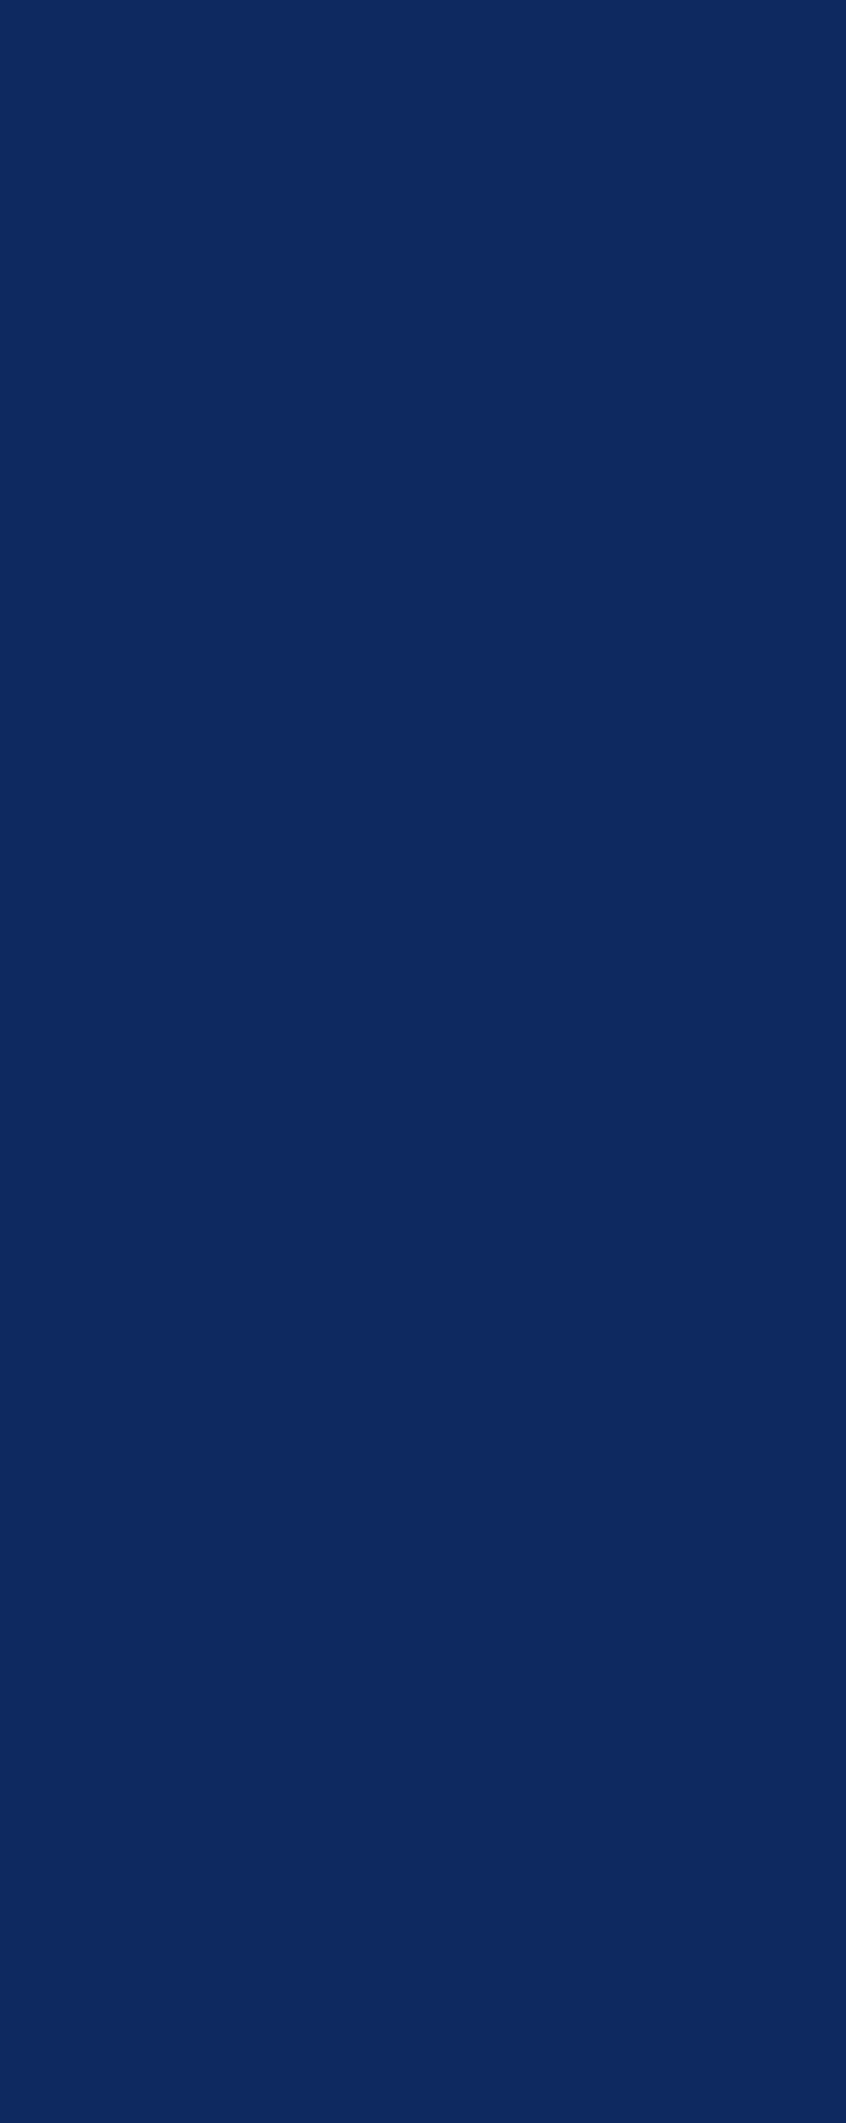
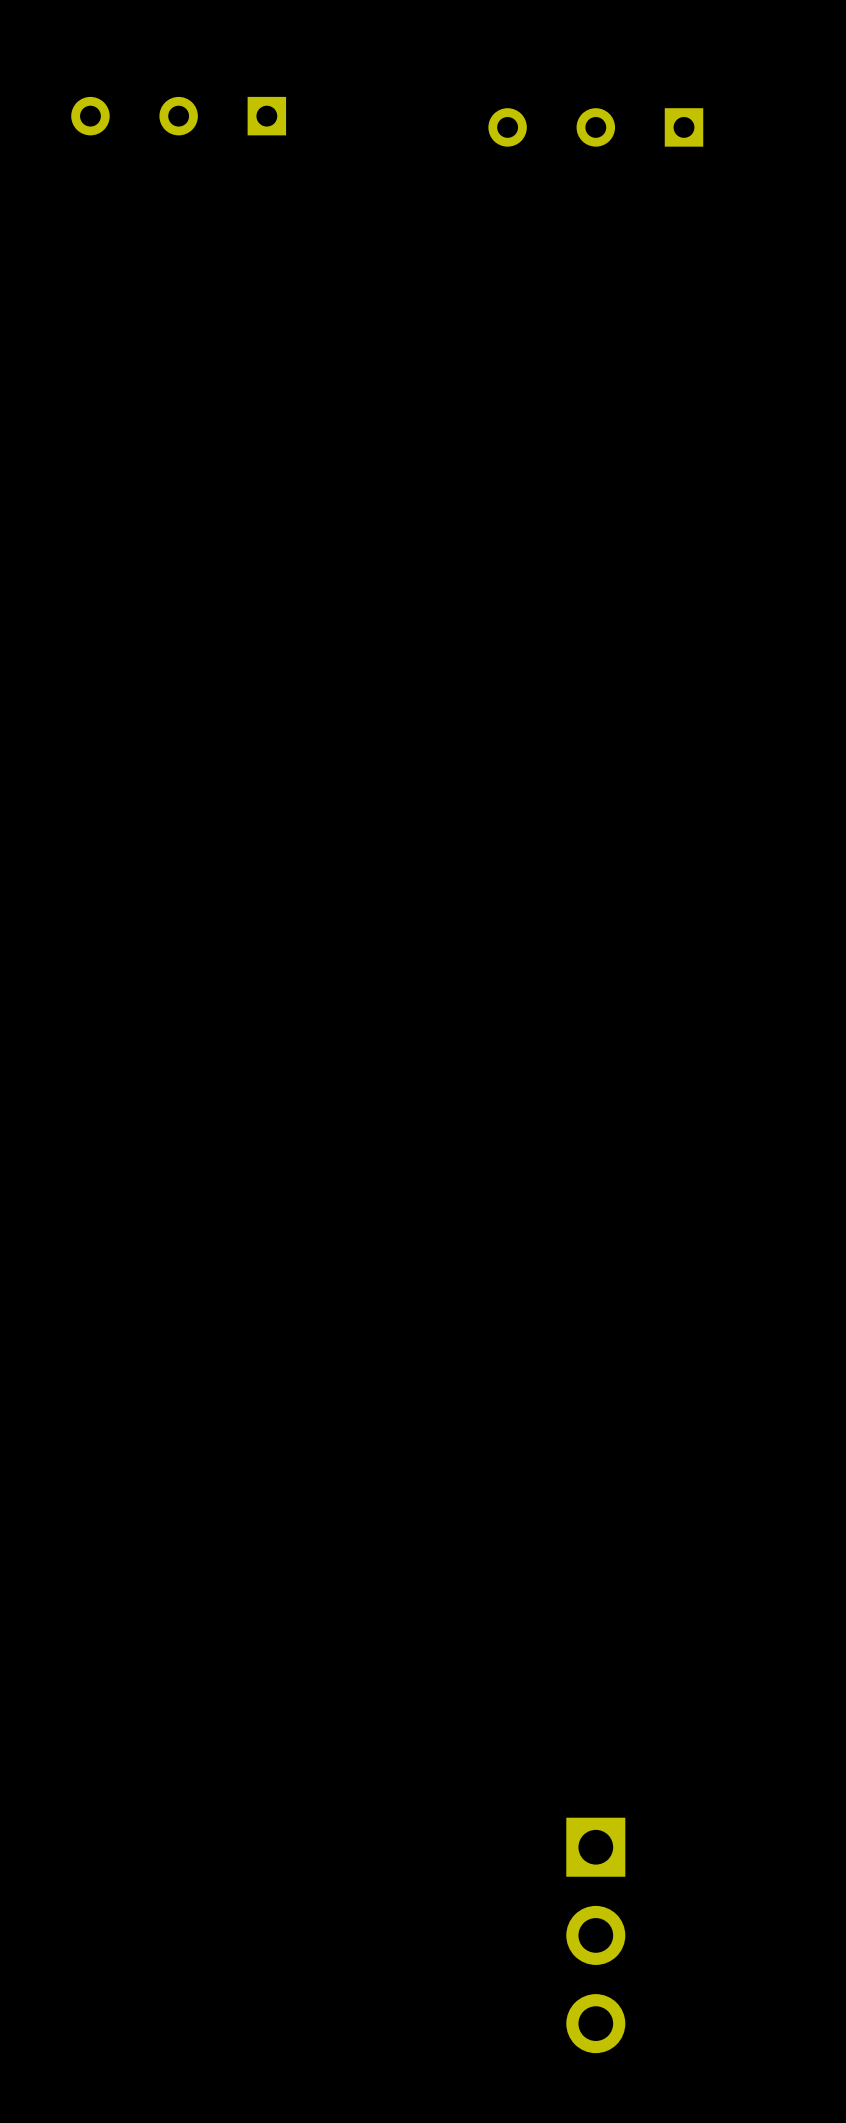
part: none -> (178, 116)
part: none -> (595, 127)
part: none -> (595, 1935)

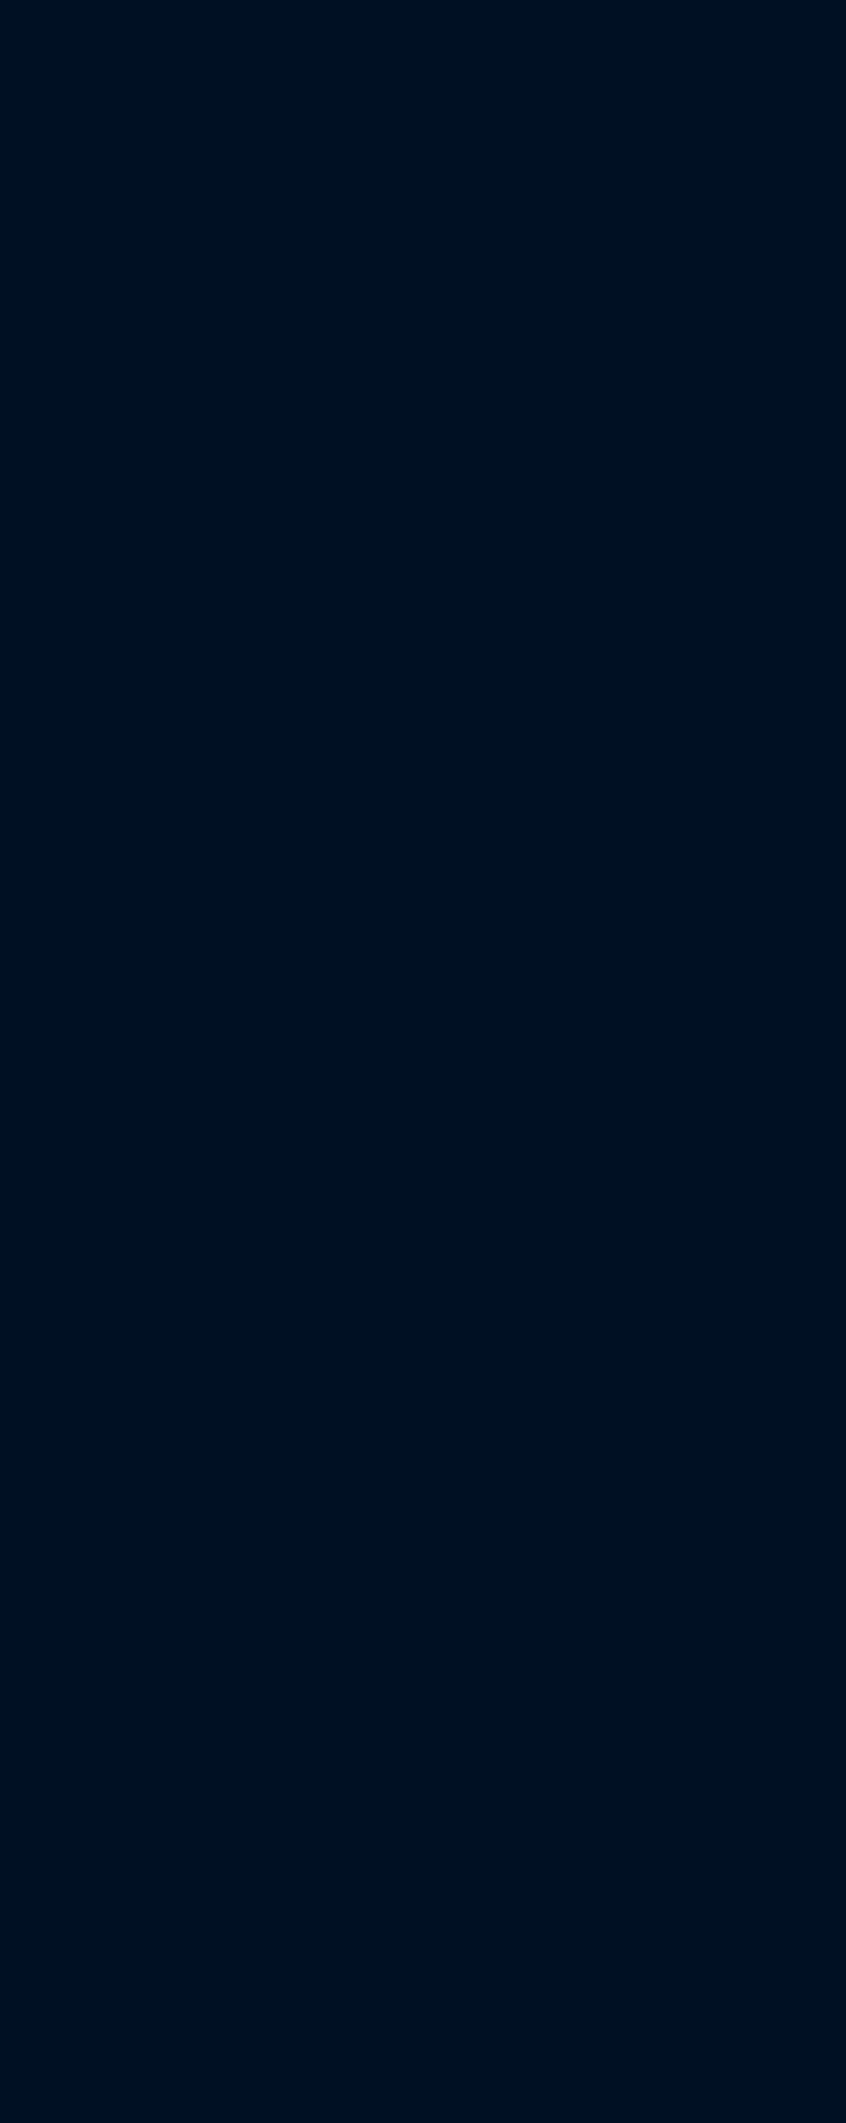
part: (178, 116) -> none
part: (595, 127) -> none
part: (595, 1935) -> none

